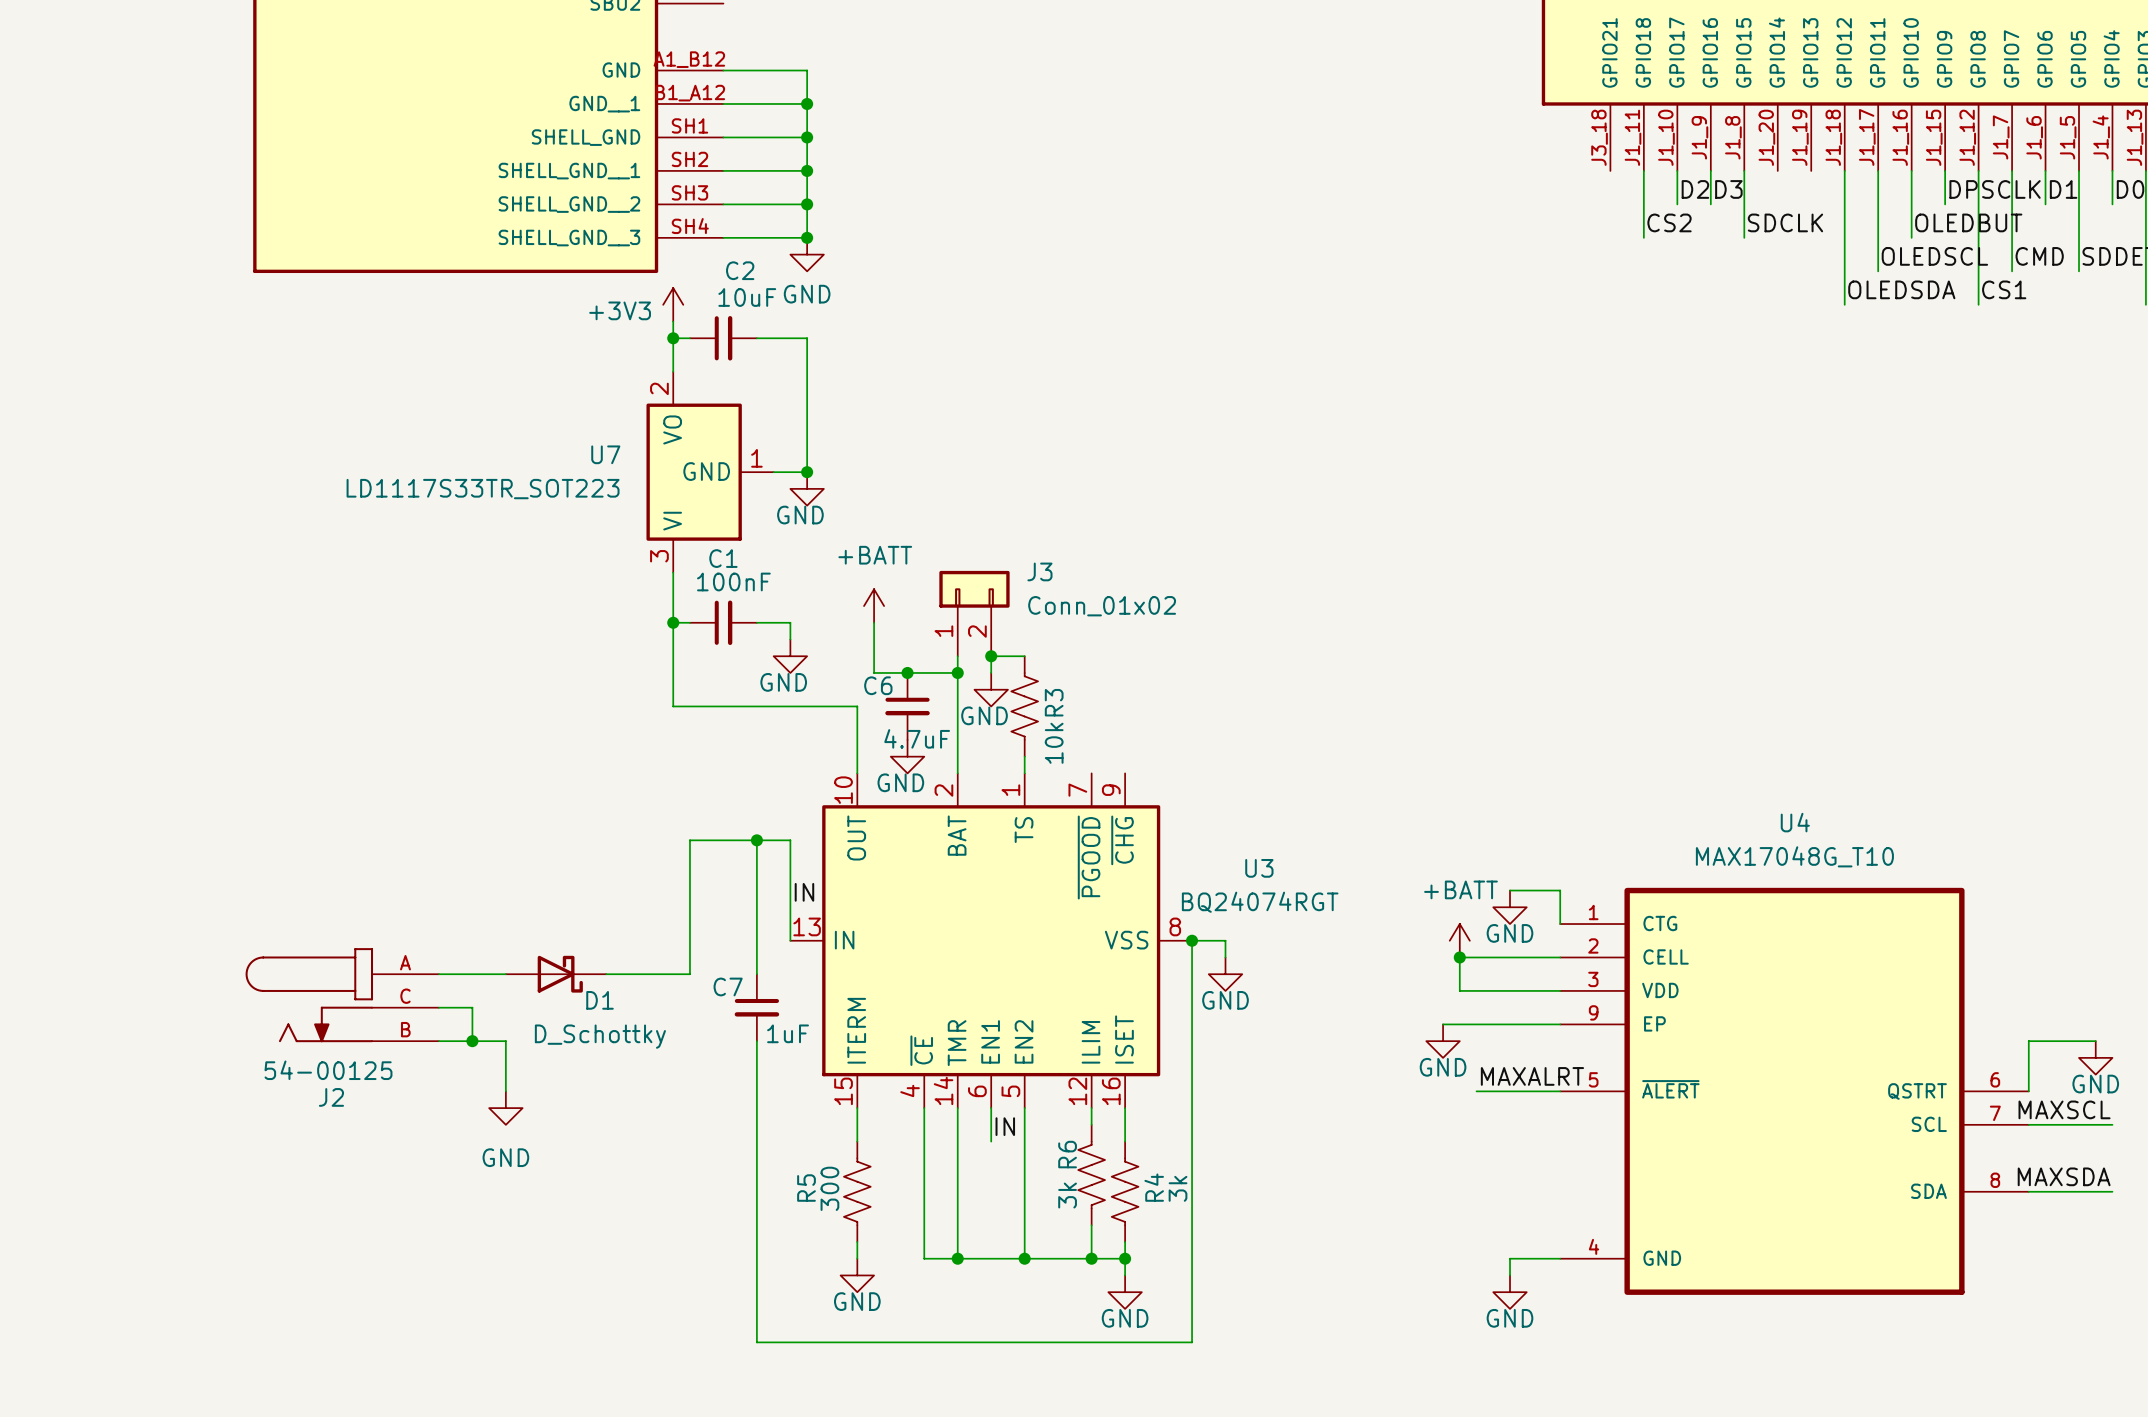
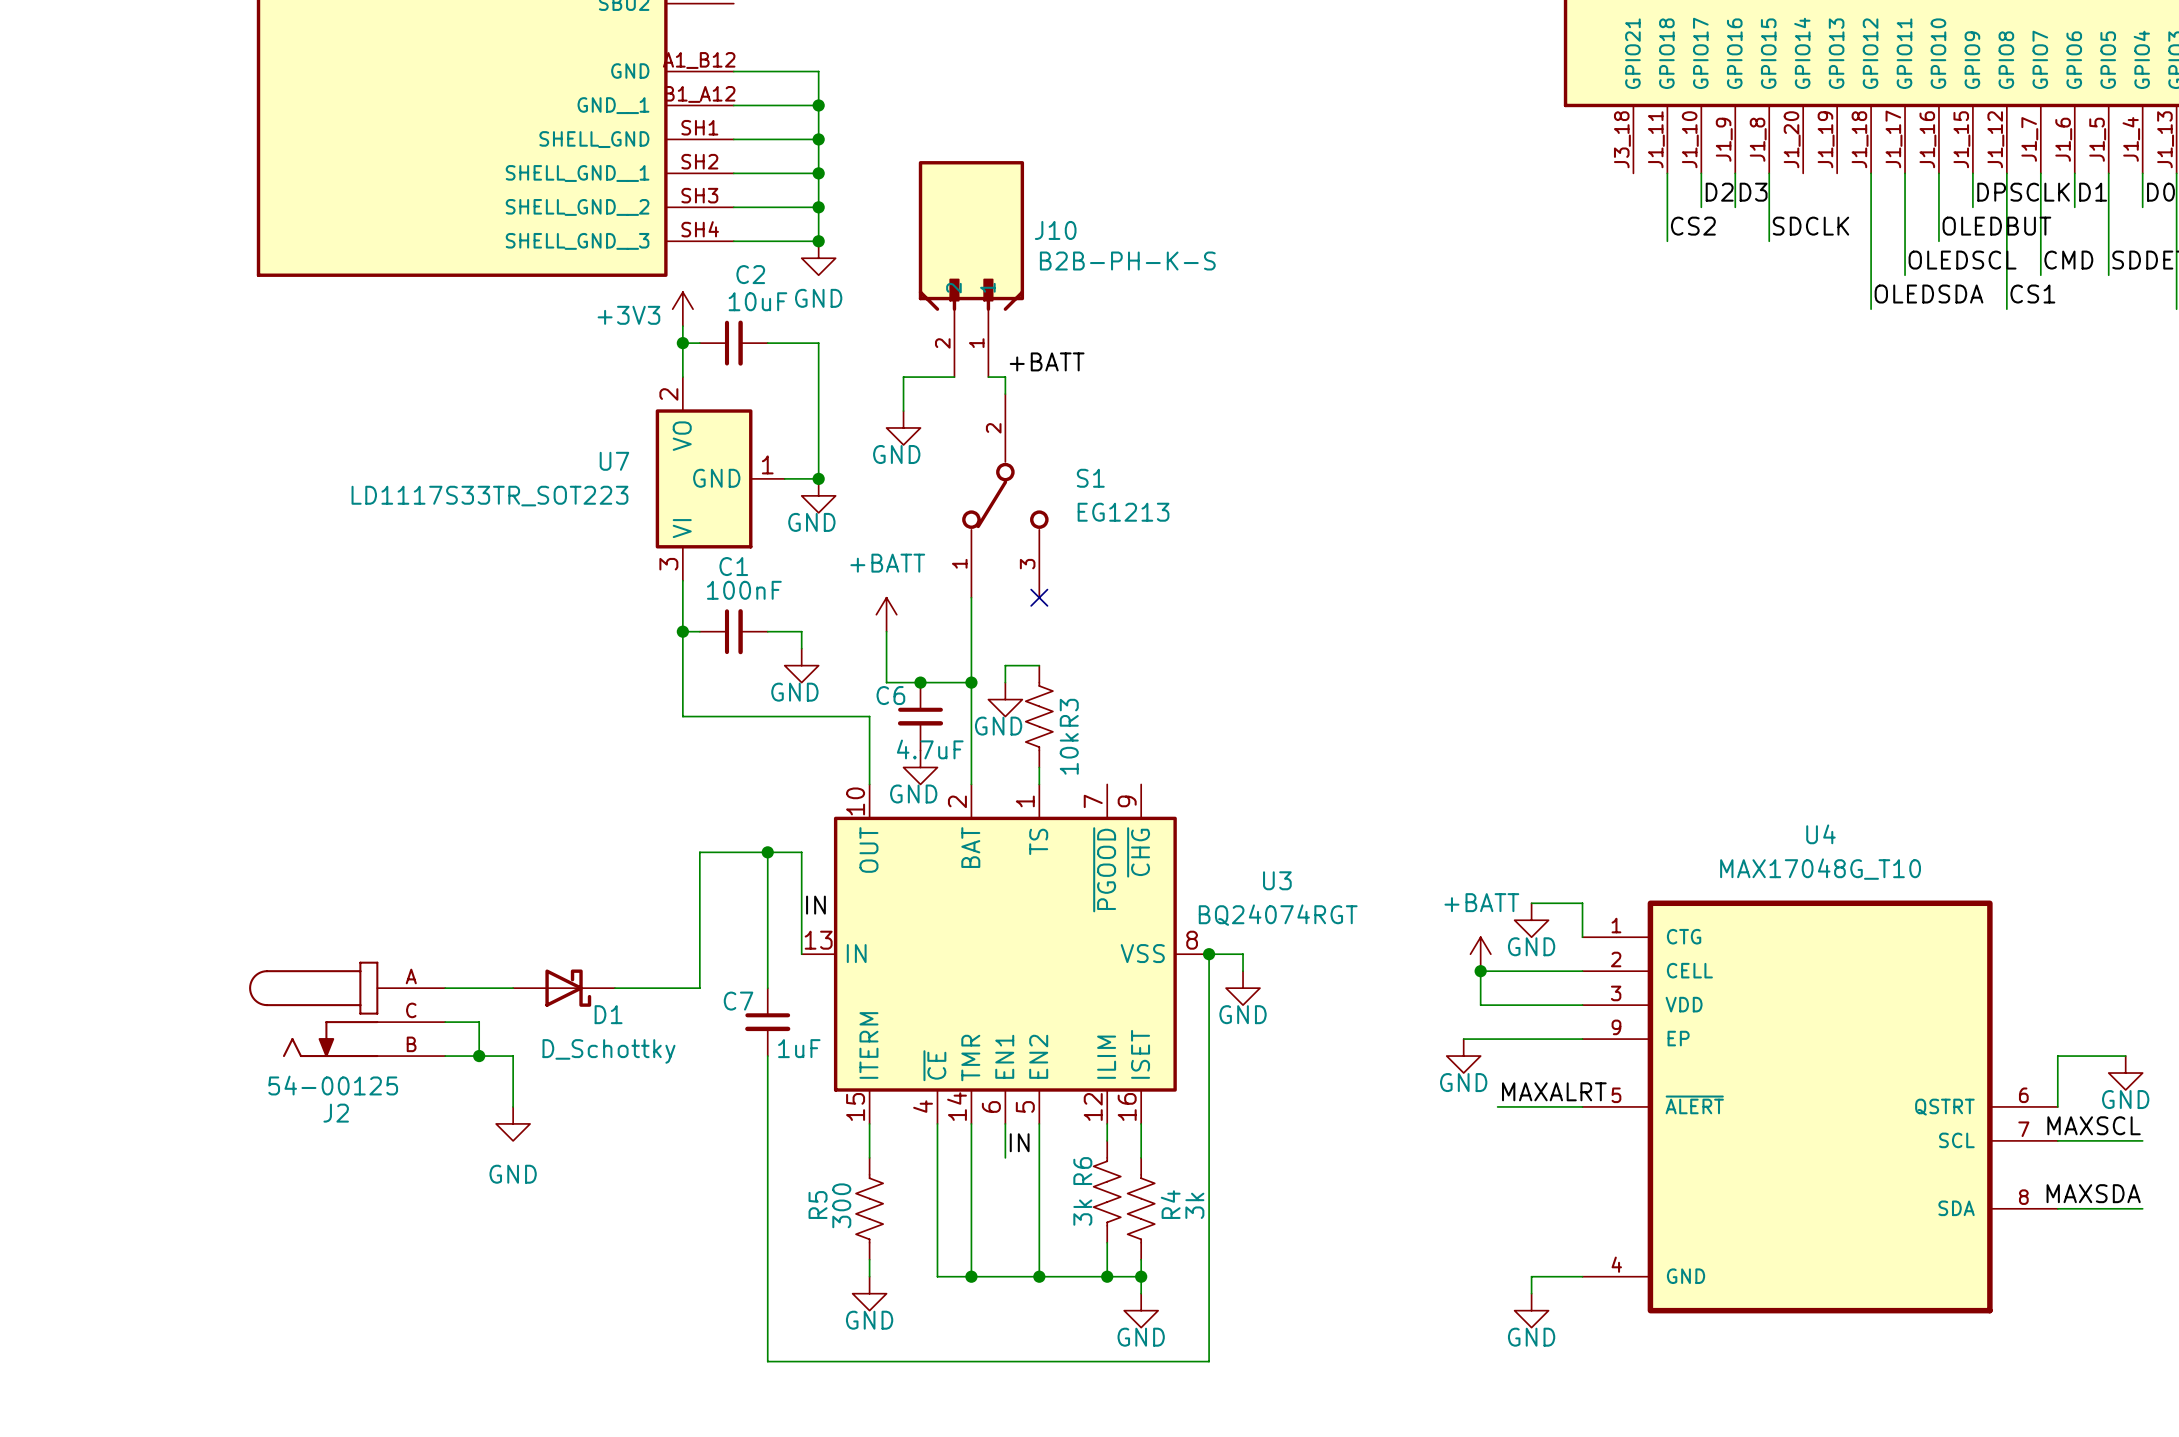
J10: none -> B2B-PH-K-S (971, 269)
label: none -> +BATT (1047, 361)
wire: none -> (954, 377) (903, 377) (903, 411)
wire: none -> (988, 377) (1005, 377) (1005, 394)
power symbol: none -> GND (903, 427)
S1: none -> EG1213 (1005, 495)
no-connect mark: none -> (1039, 597)
J3: Conn_01x02 (974, 613) -> none
junction: (991, 656) -> none

